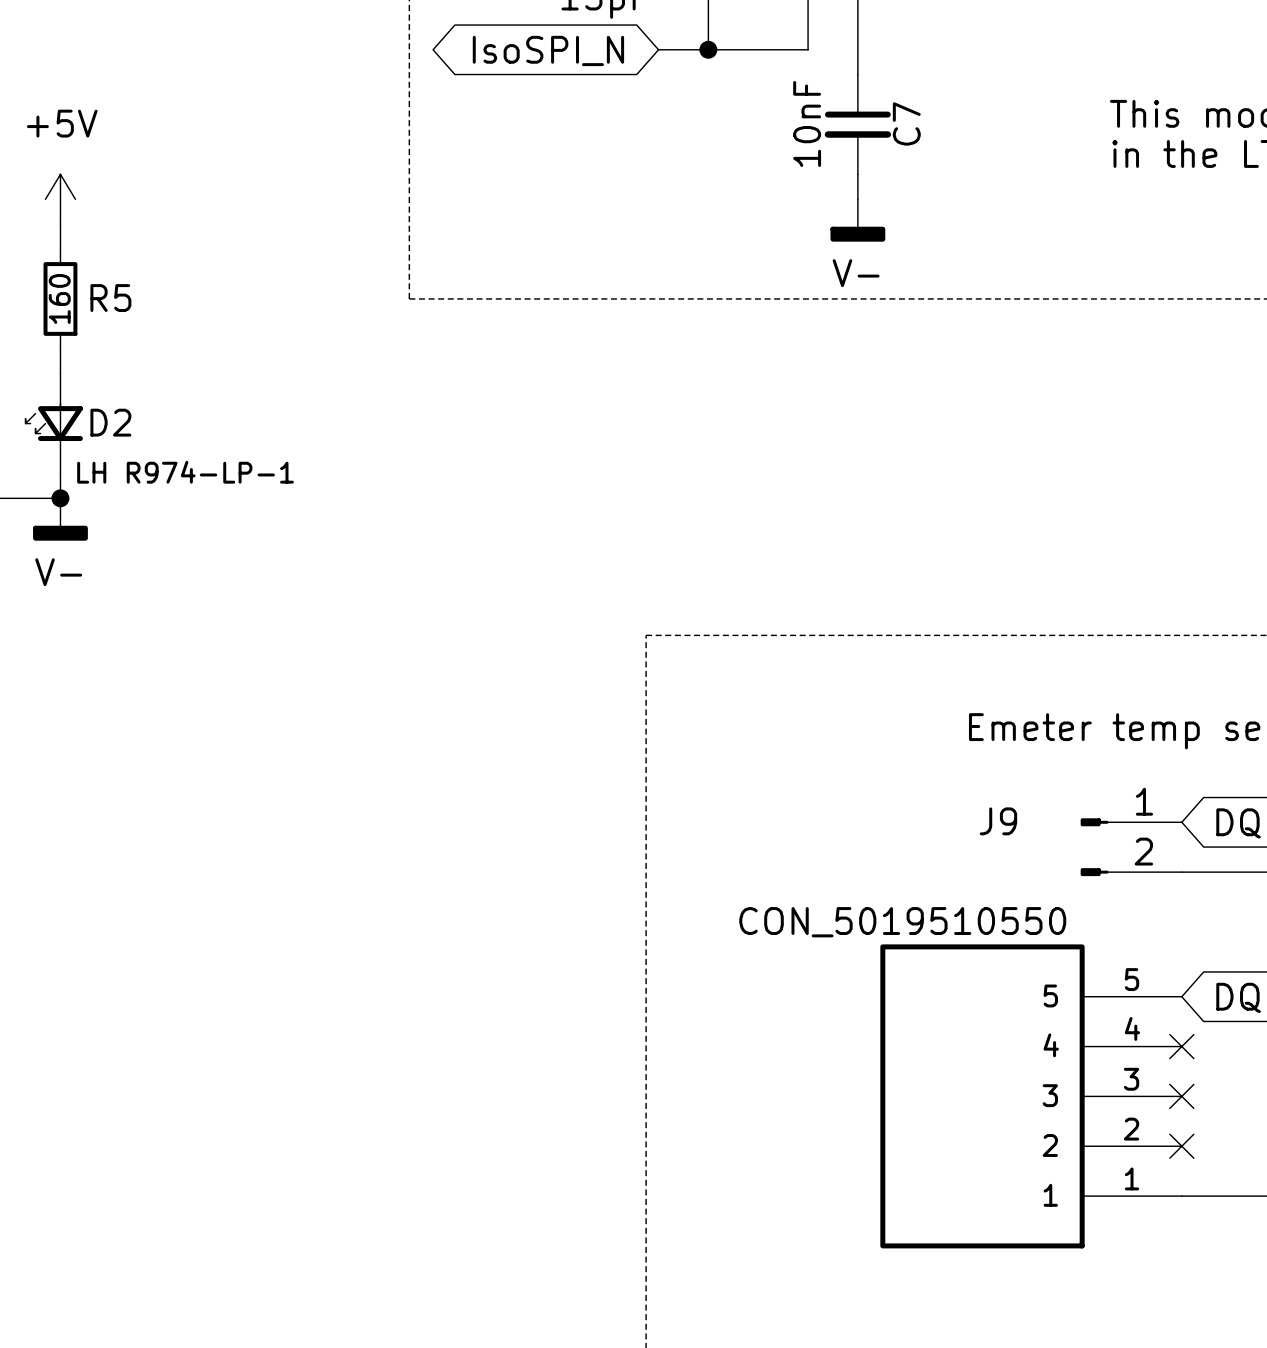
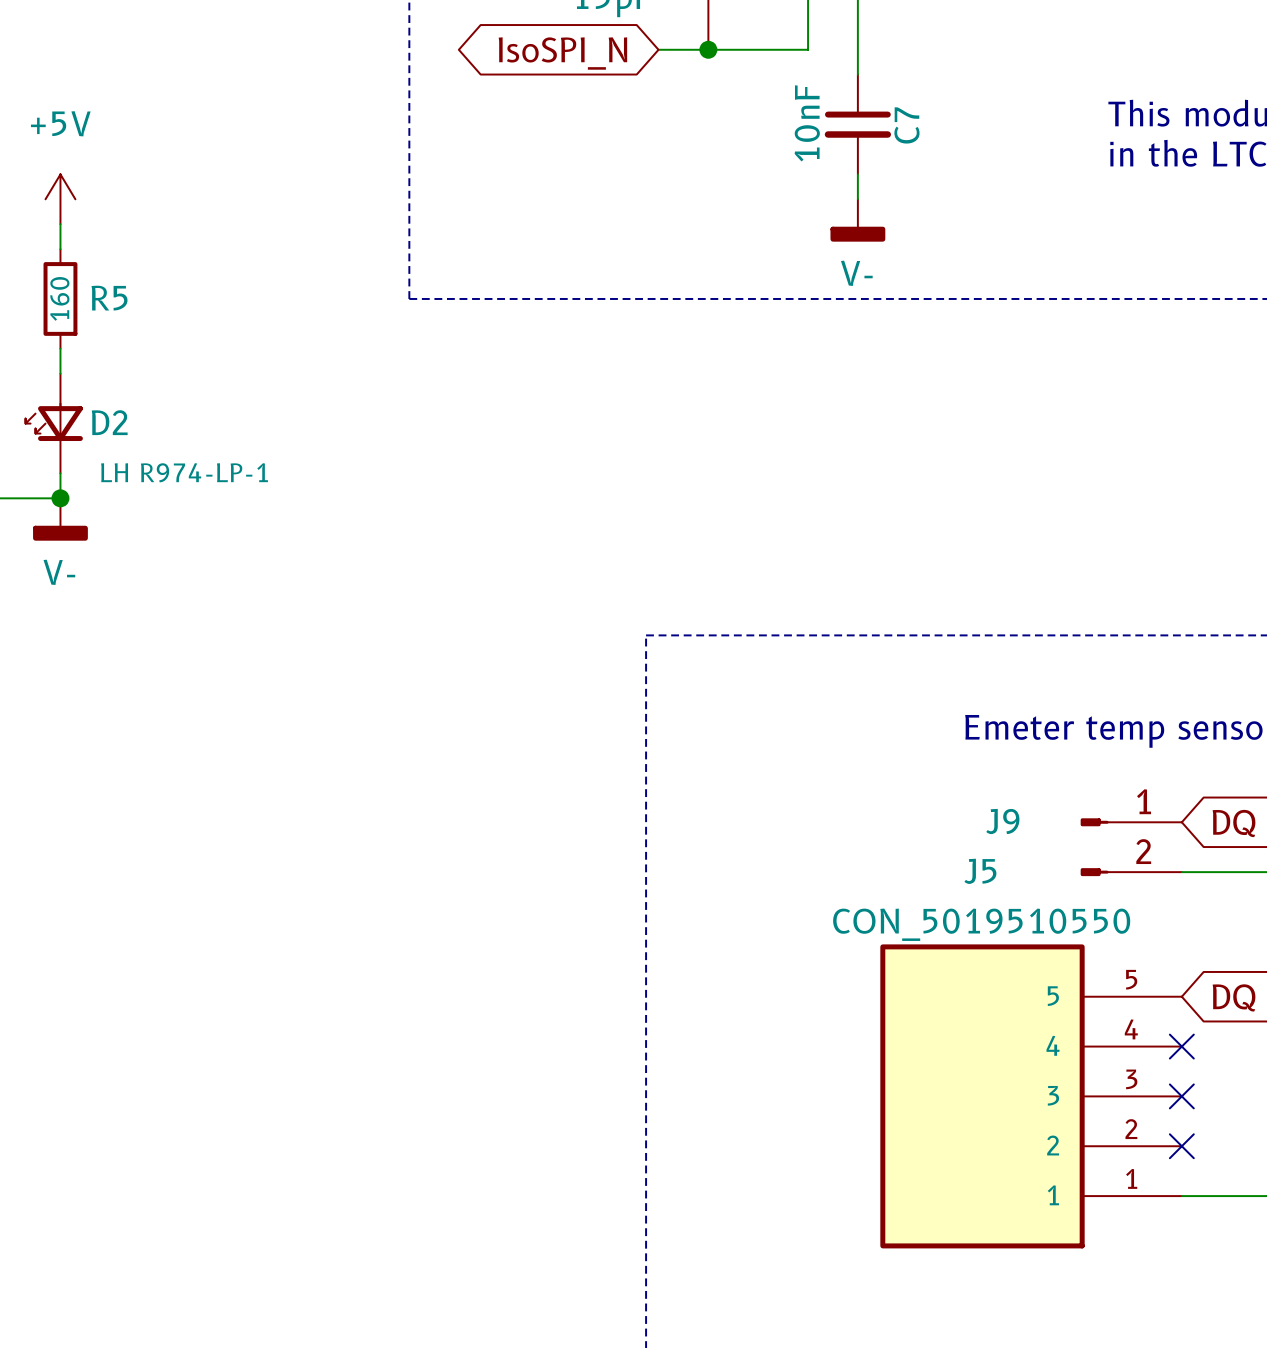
J5 name: none -> J5 (980, 871)
J5 value position: CON_5019510550 (902, 922) -> CON_5019510550 (981, 924)

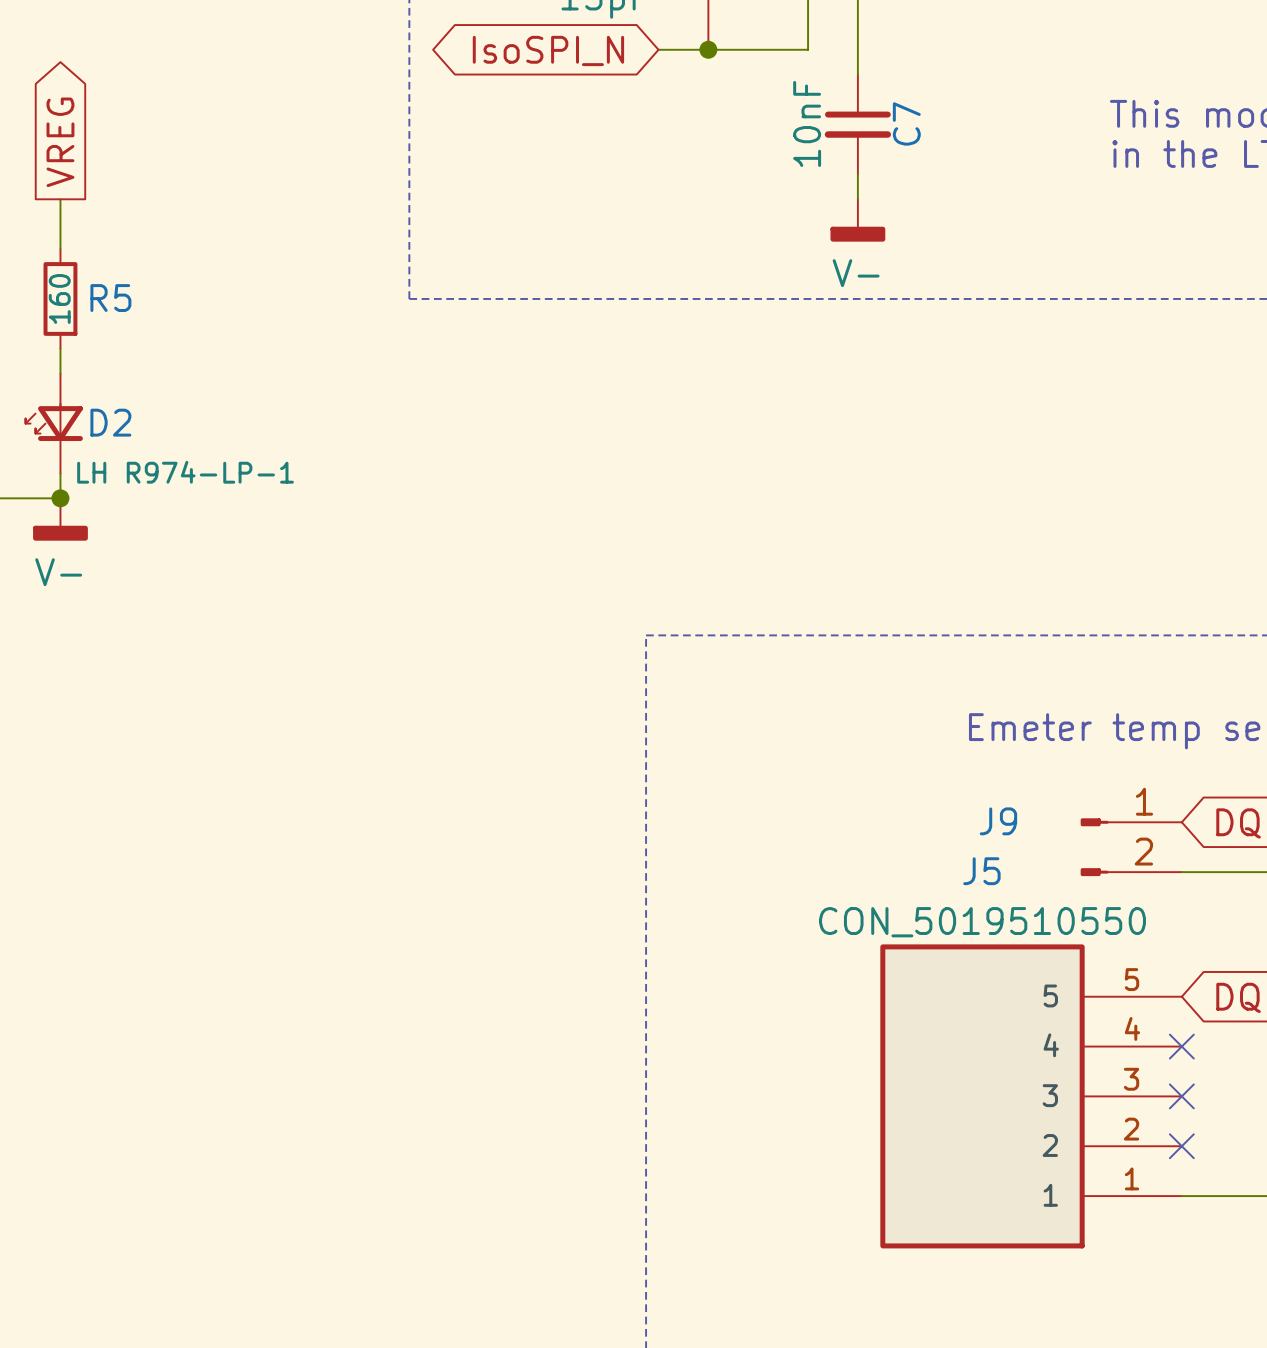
global label: none -> VREG (60, 142)
power symbol: +5V (60, 199) -> none

